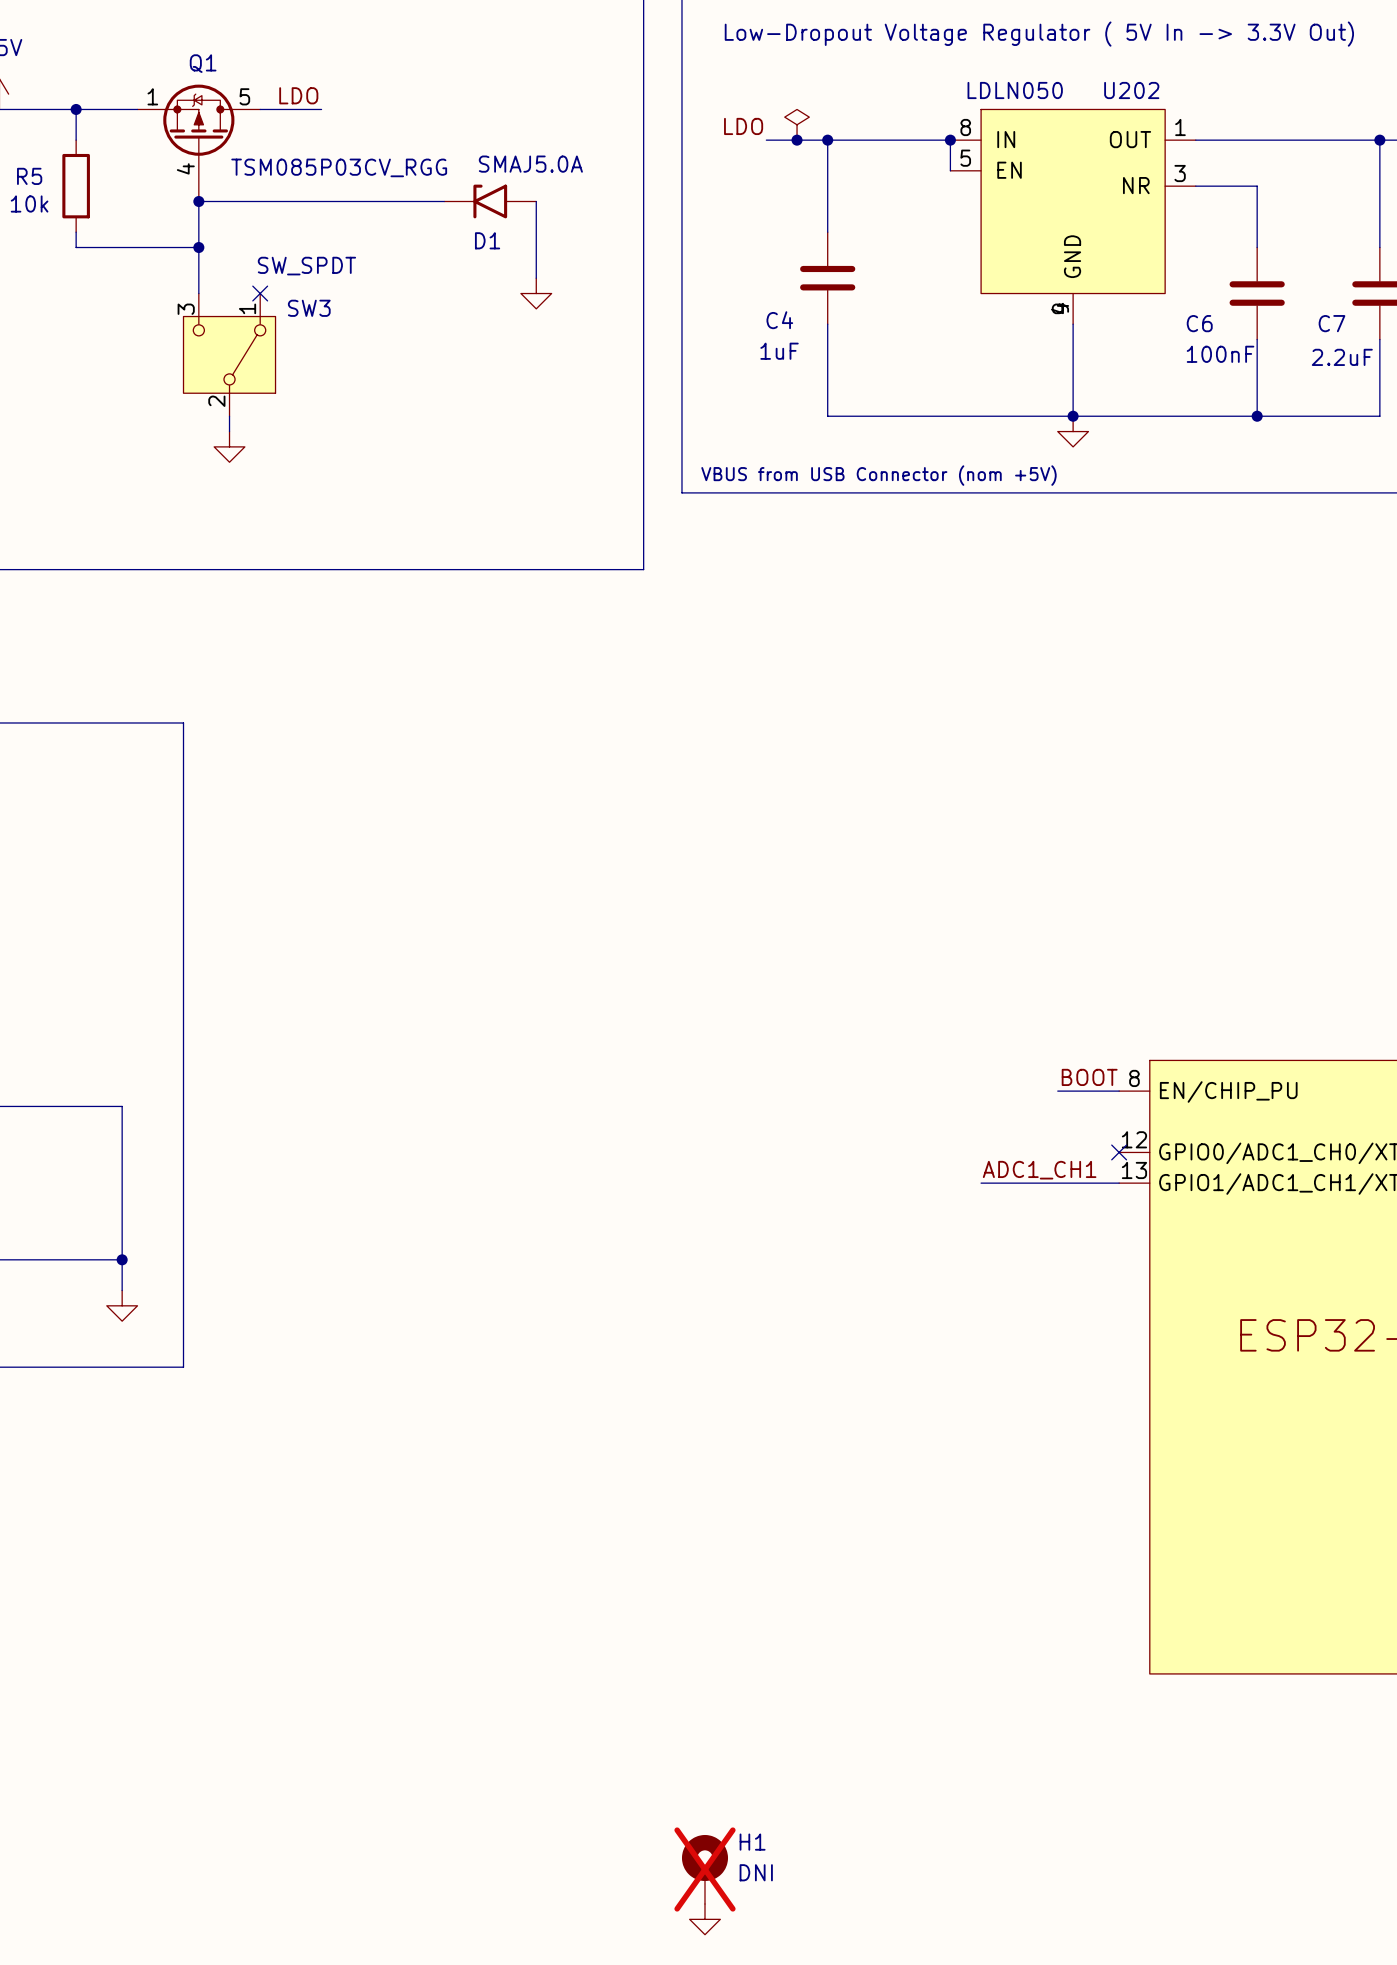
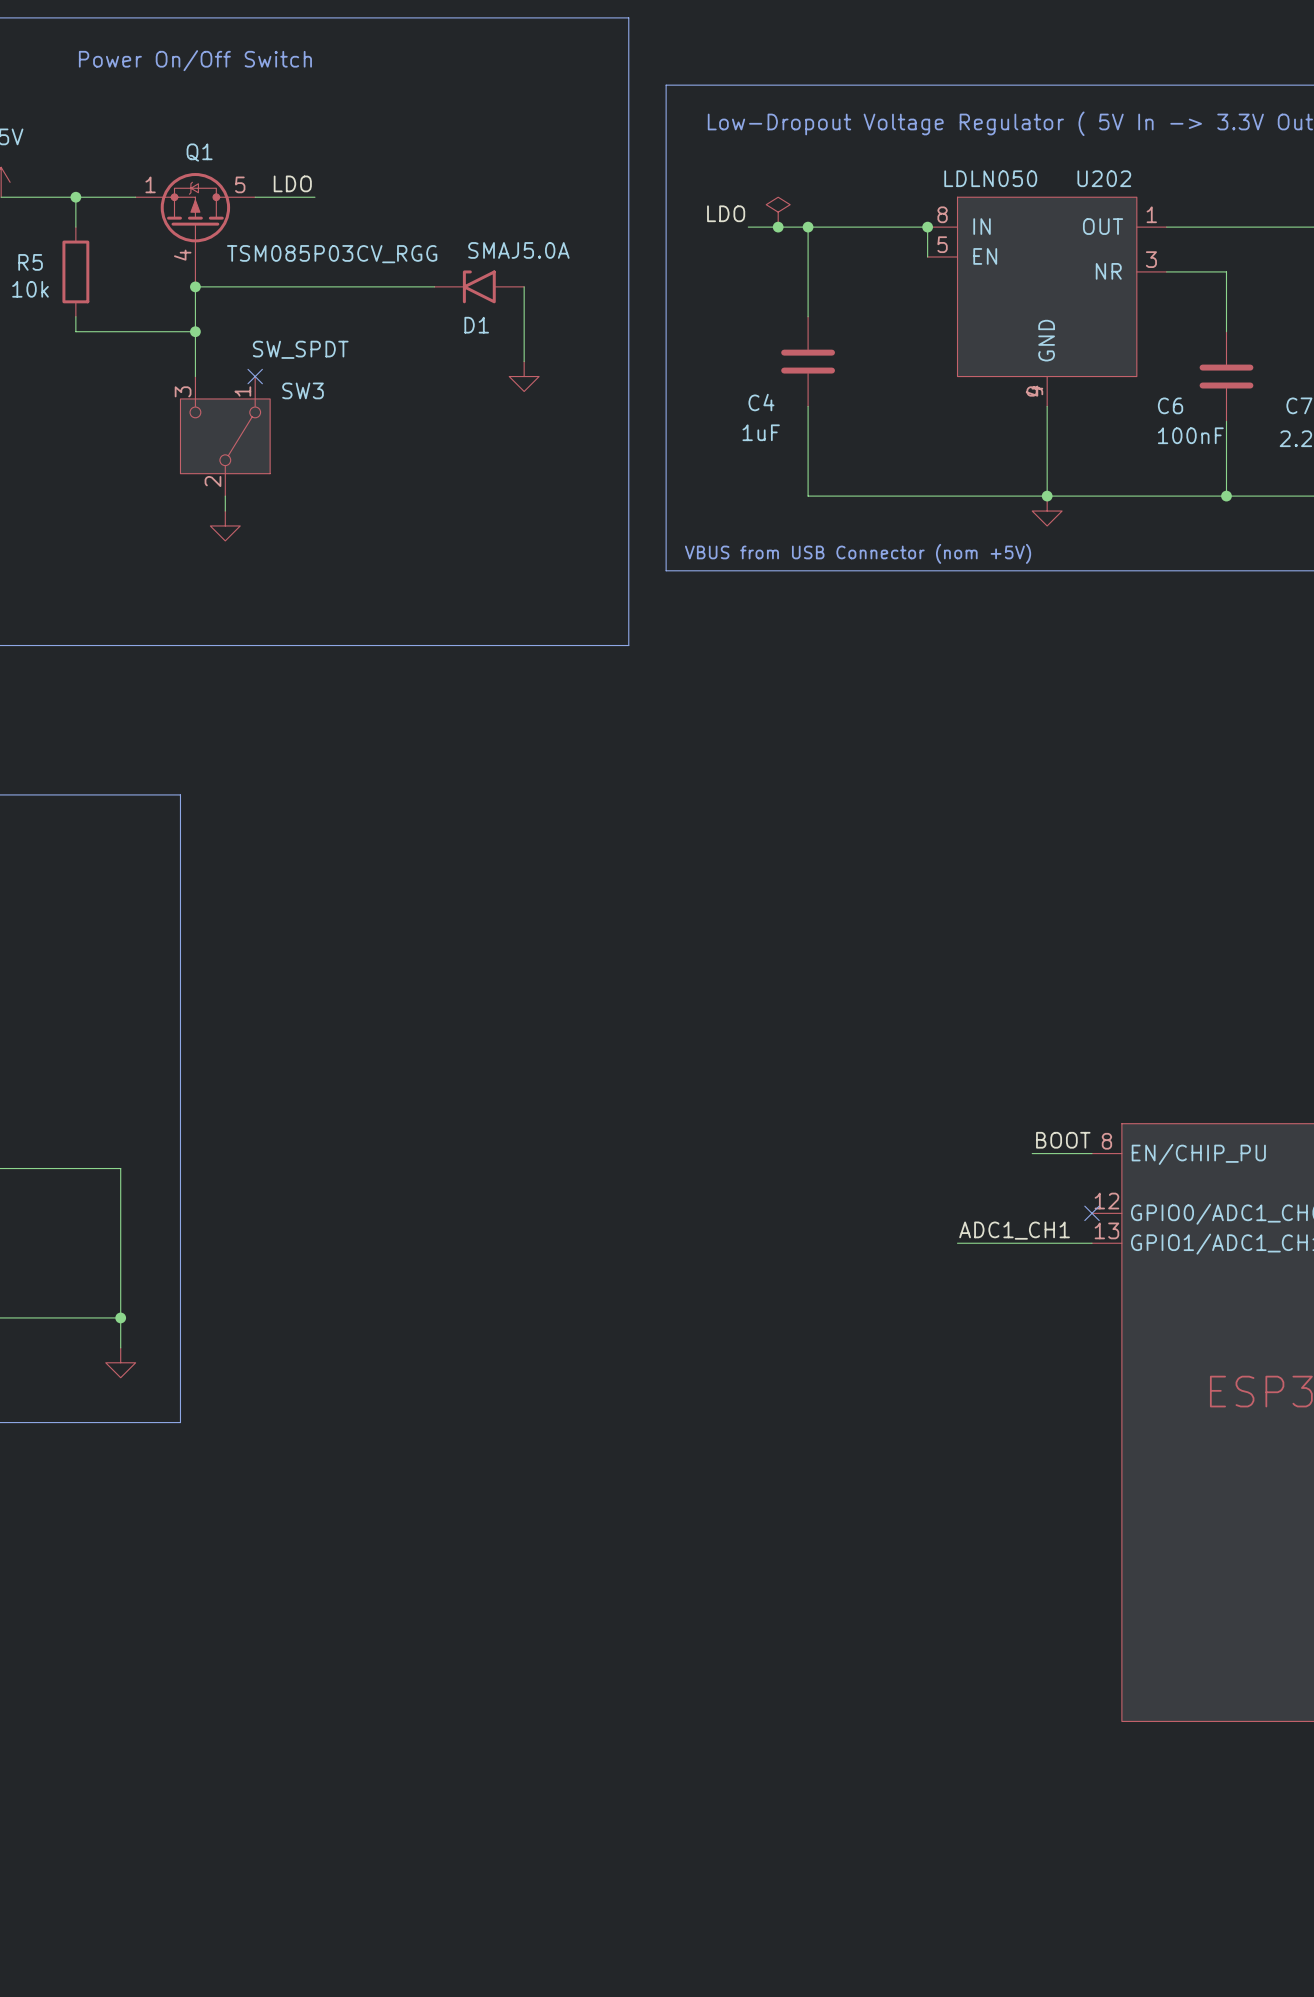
H1: DNI (704, 1869) -> none
power symbol: (704, 1919) -> none

